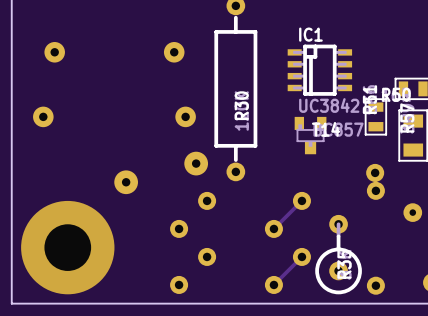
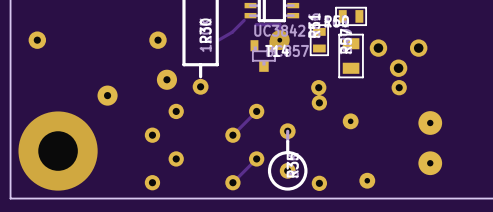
track: none -> (244, 20) (232, 32) (218, 40)
track: none -> (256, 24) (279, 24) (279, 40)
via: none -> (279, 40)

